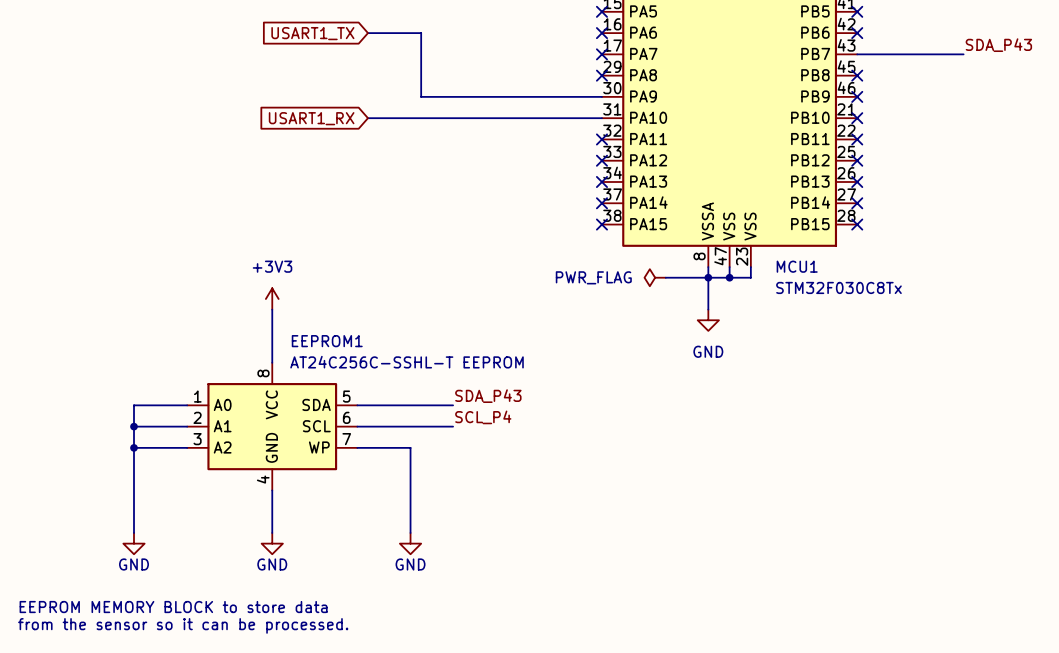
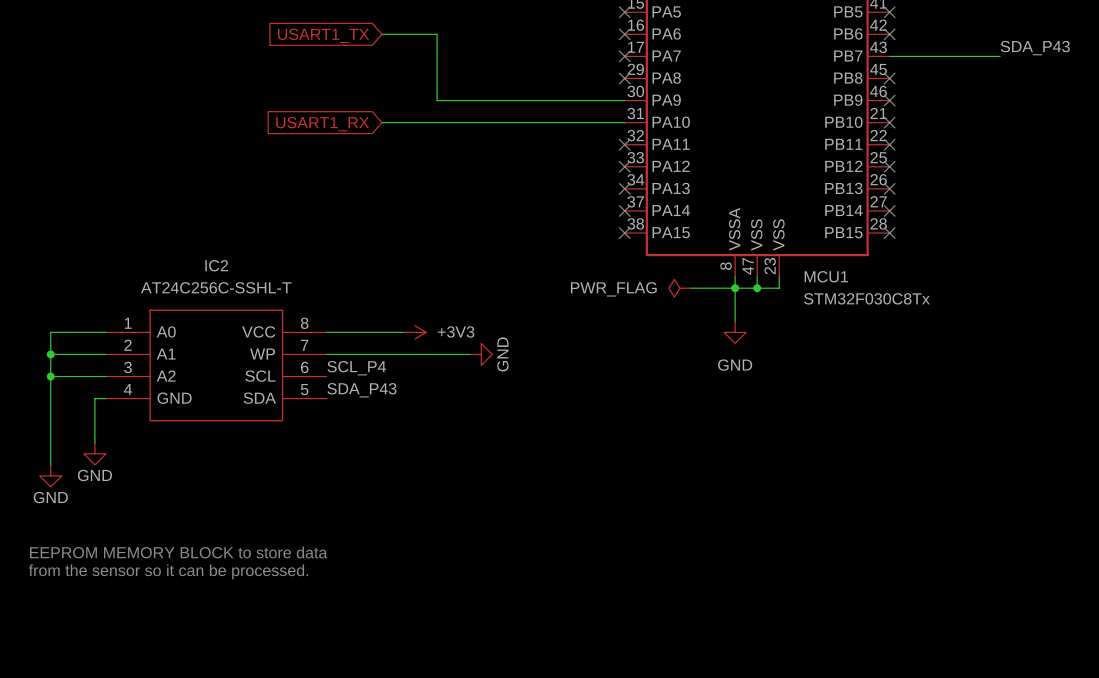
power symbol rotation: 0° (272, 298) -> 90° clockwise (415, 332)
power symbol position: +3V3 (272, 298) -> +3V3 (415, 332)
wire: none -> (326, 332) (403, 332)
junction: none -> (50, 354)
wire: none -> (326, 354) (470, 354)
power symbol: none -> GND (481, 354)
IC2: none -> AT24C256C-SSHL-T (216, 365)
junction: none -> (50, 376)
wire: none -> (105, 398) (94, 398) (94, 442)
label position: SDA_P43 (488, 396) -> SDA_P43 (361, 390)
wire: (187, 405) (134, 405) (134, 532) -> (105, 332) (50, 332) (50, 464)
wire: (357, 405) (453, 405) -> none
label position: SCL_P4 (483, 417) -> SCL_P4 (356, 368)
wire: (134, 426) (187, 426) -> (50, 354) (105, 354)
junction: (134, 426) -> none
EEPROM1: AT24C256C-SSHL-T EEPROM (272, 426) -> none
wire: (357, 426) (453, 426) -> none
power symbol: none -> GND (94, 453)
wire: (134, 447) (187, 447) -> (50, 376) (105, 376)
junction: (134, 447) -> none
wire: (357, 447) (410, 447) (410, 532) -> none
power symbol: none -> GND (50, 475)
wire: (272, 490) (272, 532) -> none
power symbol: GND (134, 543) -> none
power symbol: GND (272, 543) -> none
power symbol: GND (410, 543) -> none
text position: EEPROM MEMORY BLOCK to store data (173, 607) -> EEPROM MEMORY BLOCK to store data (178, 552)
text position: from the sensor so it can be processed. (183, 625) -> from the sensor so it can be processed. (168, 571)

